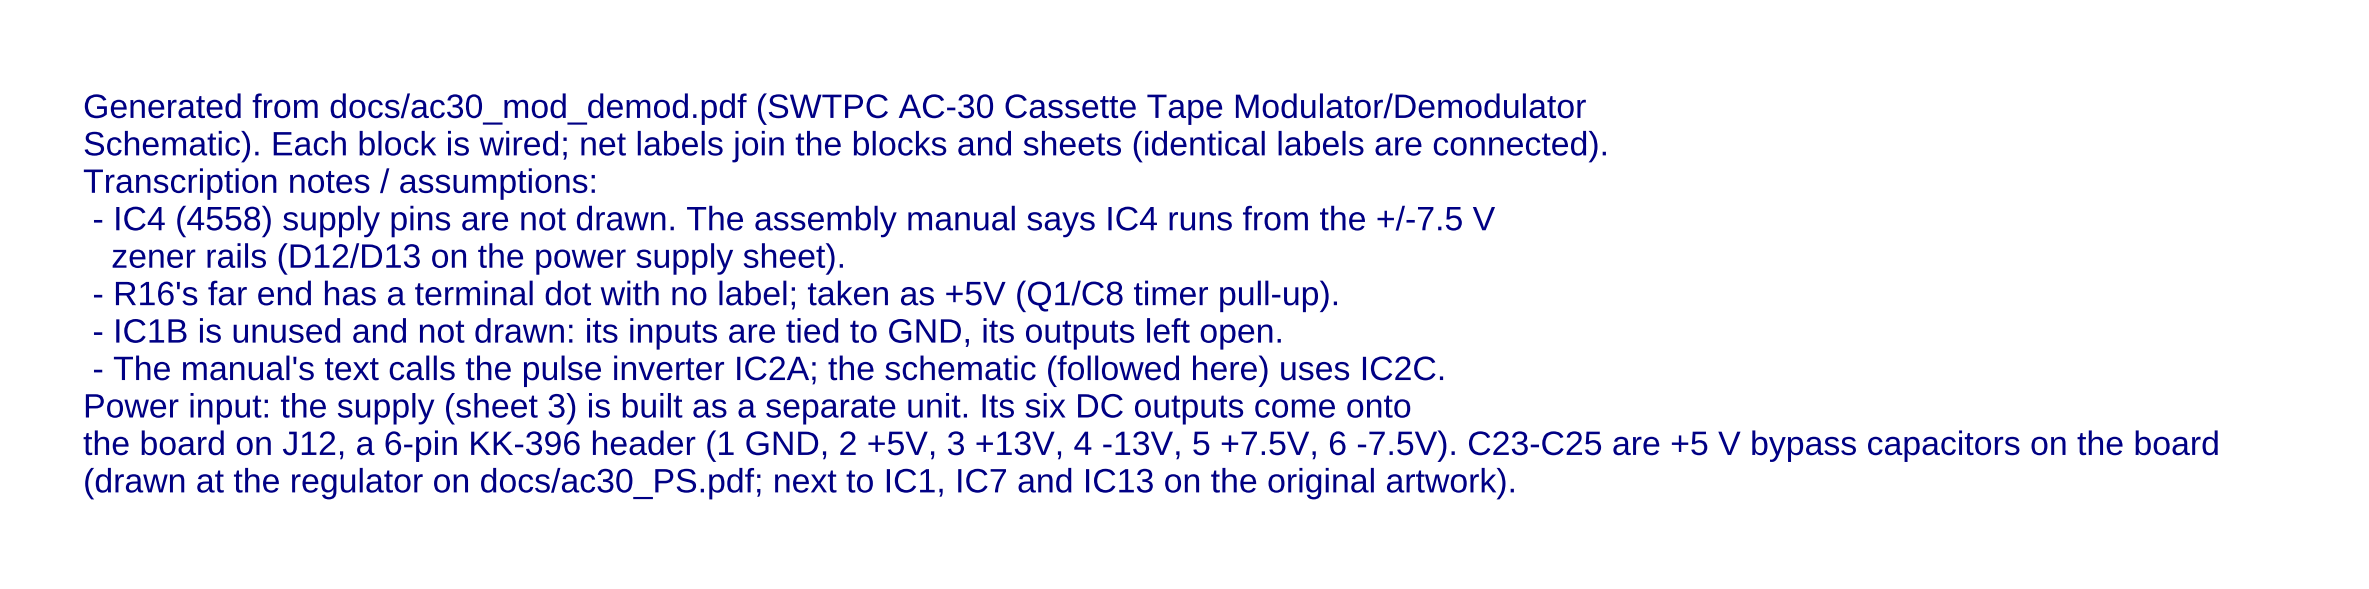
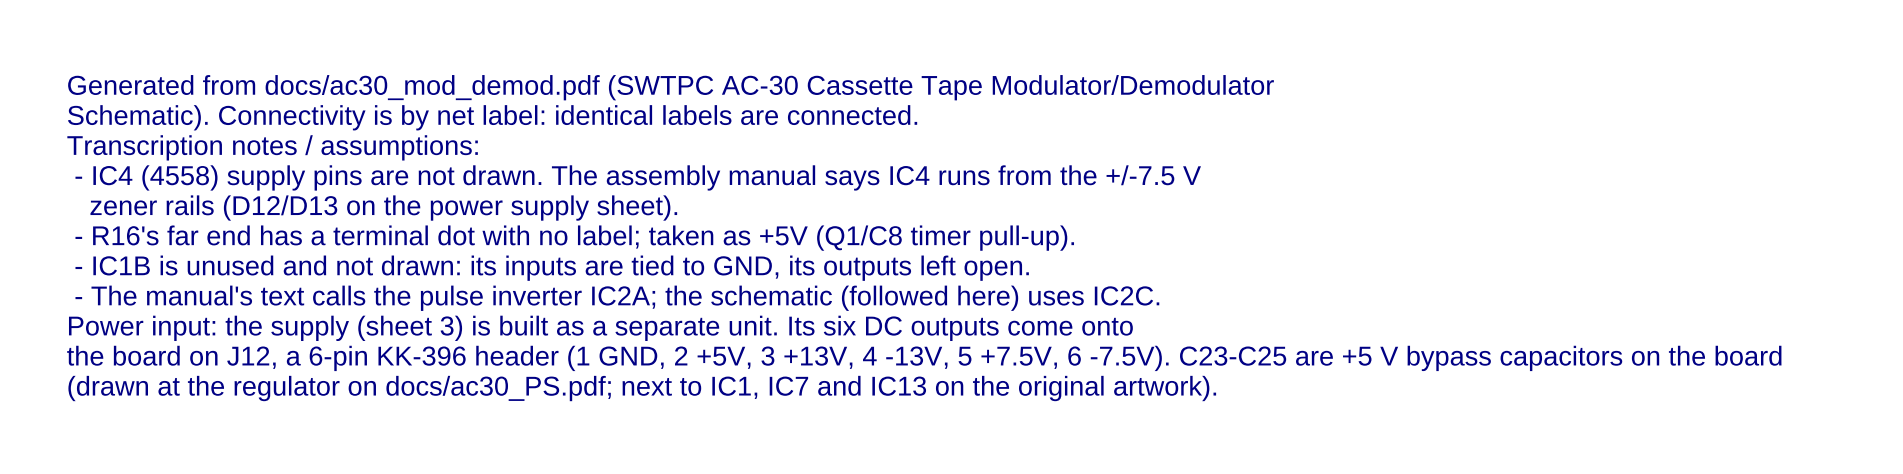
text: Schematic). Each block is wired; net labels join the blocks and sheets (identical labels are connected). (845, 146) -> Schematic). Connectivity is by net label: identical labels are connected. (492, 117)

